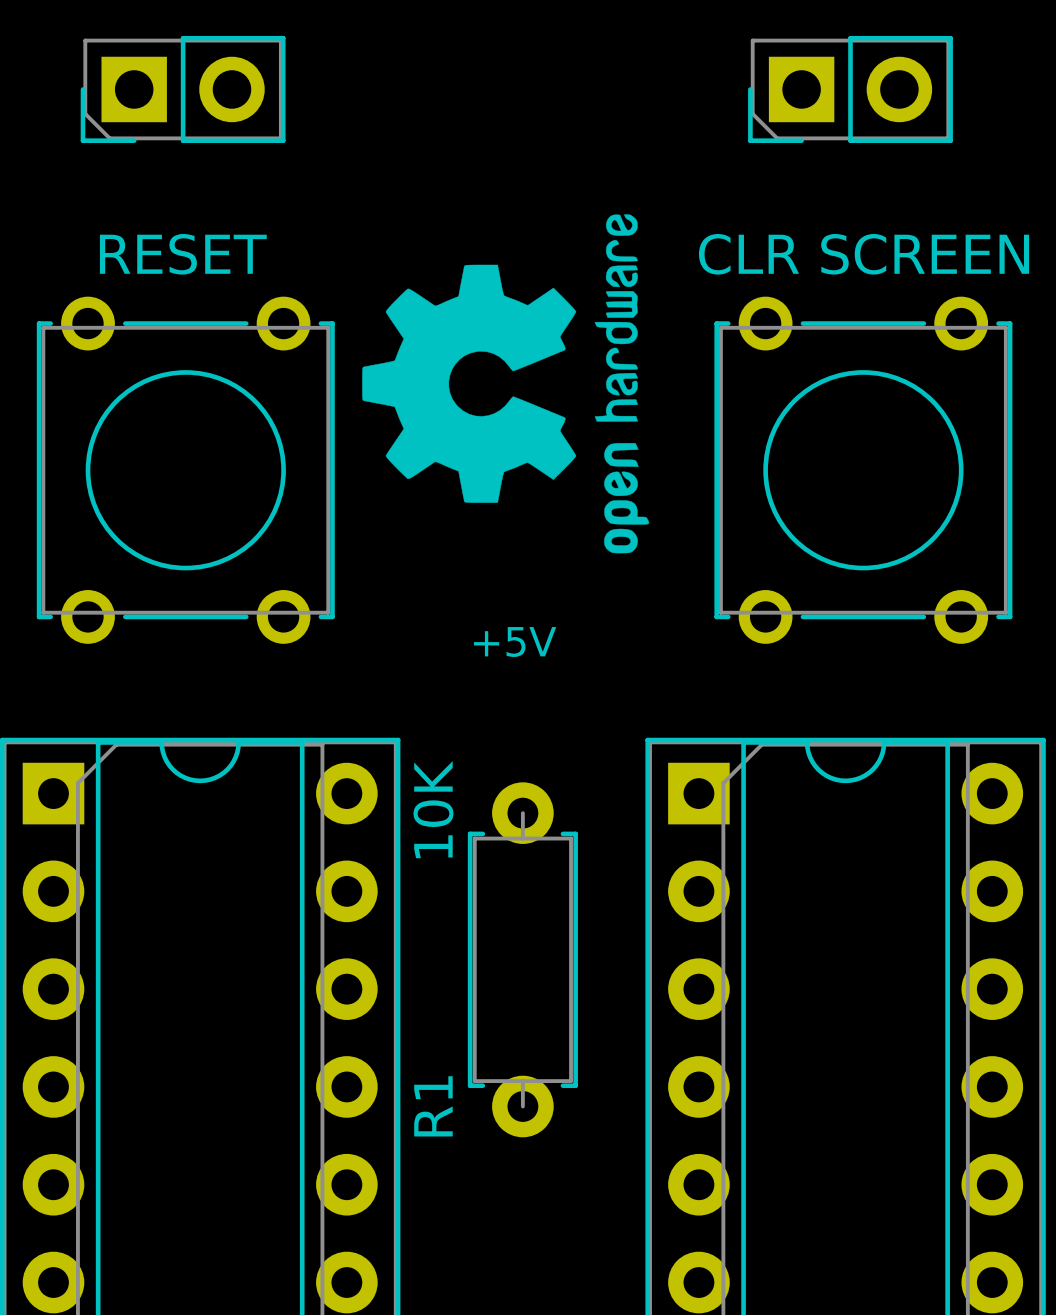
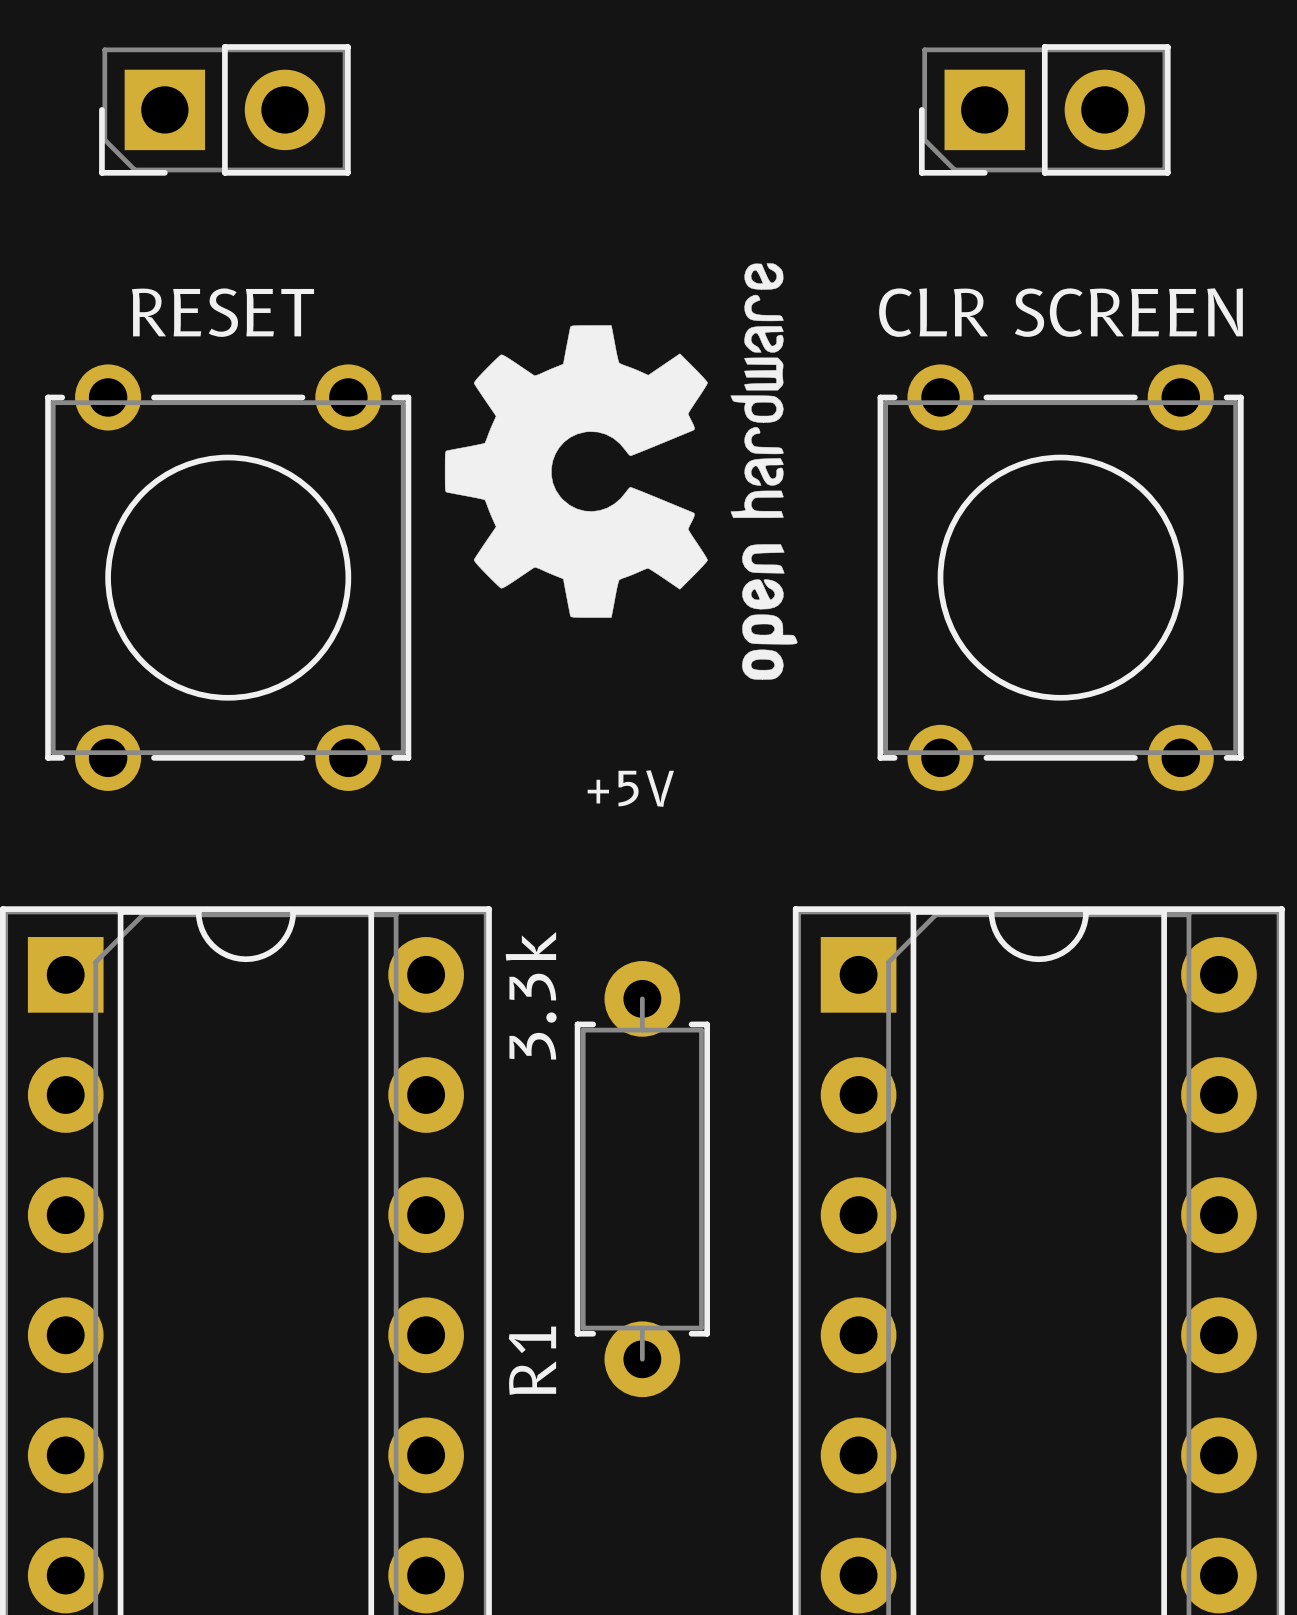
R1 value: 10K (433, 809) -> 3.3k (531, 995)

